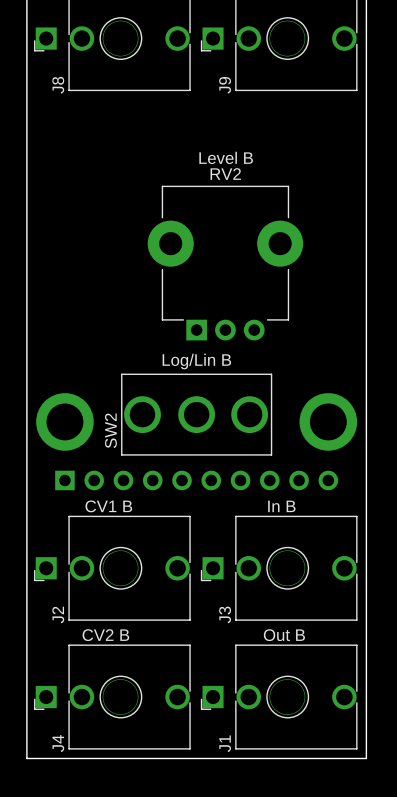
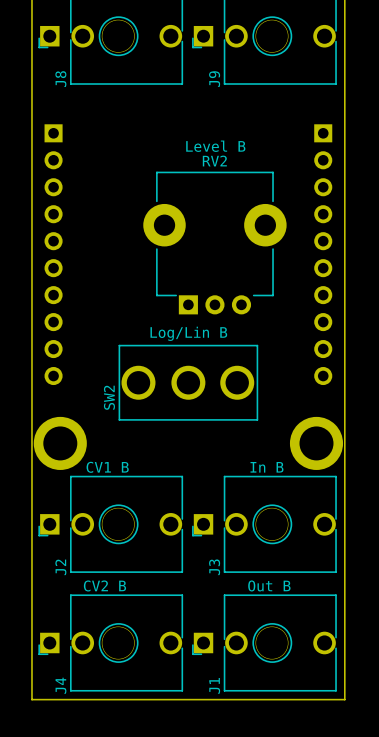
part: none -> (53, 254)
part: none -> (323, 254)
part position: (64, 421) -> (60, 443)
part position: (328, 421) -> (316, 443)
part: (196, 480) -> none

